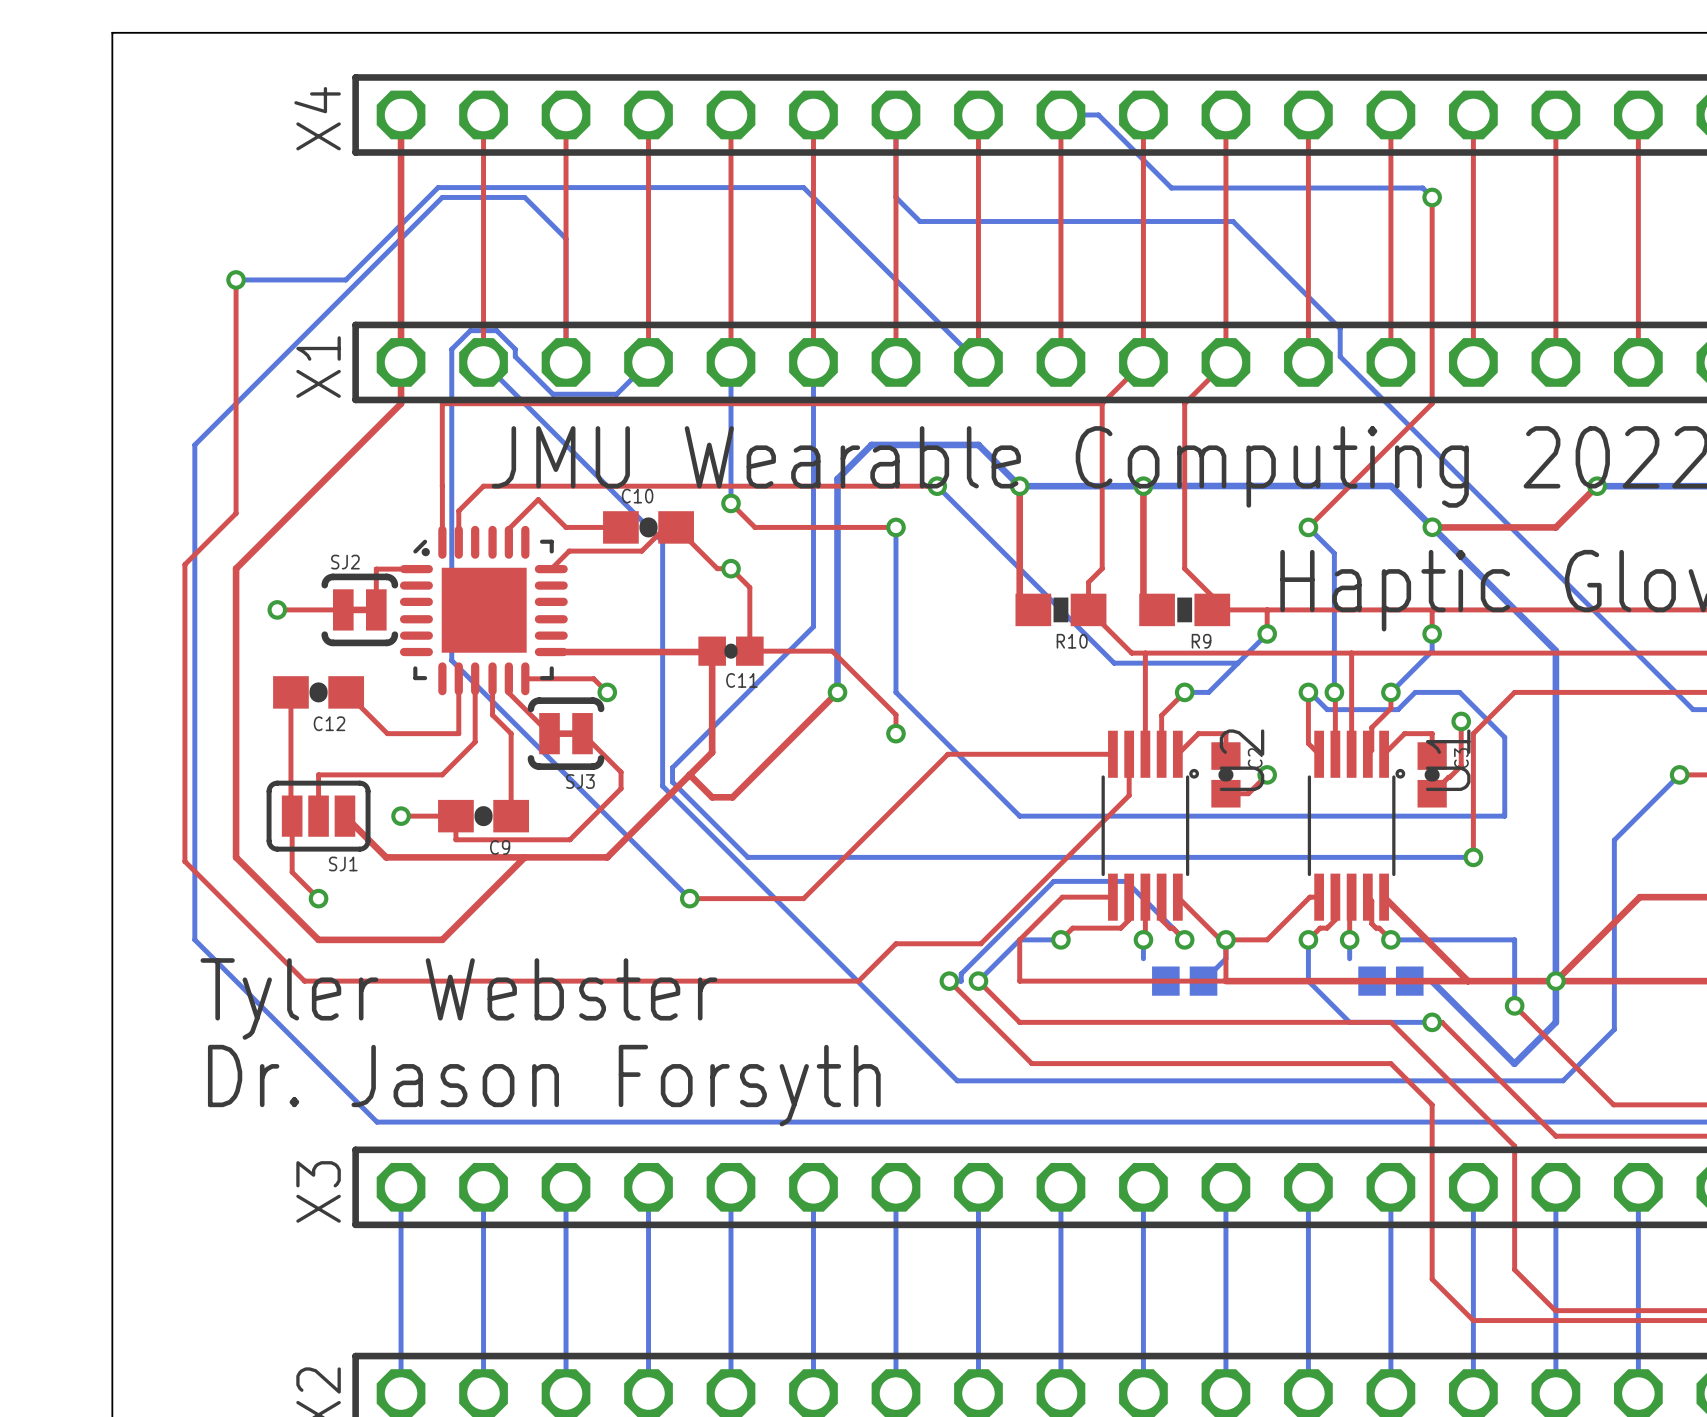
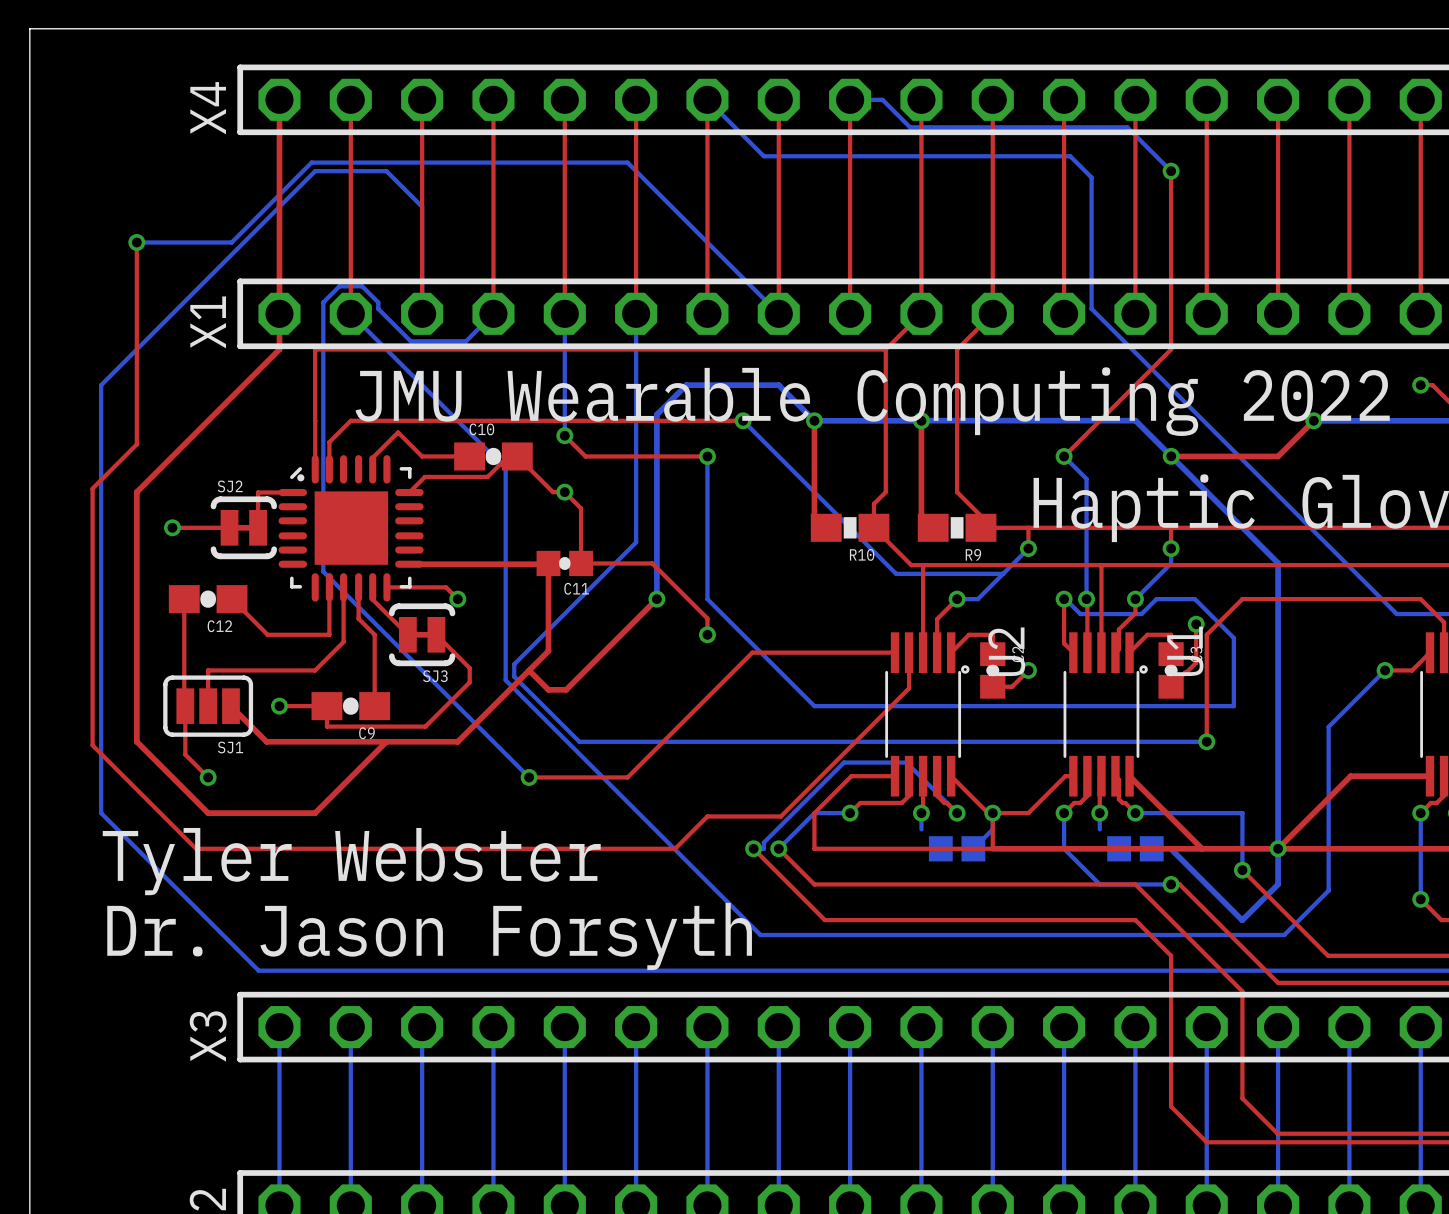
bottom track: (895, 114) (895, 197) (919, 221) (1233, 221) (1340, 328) -> (707, 99) (763, 156) (1070, 156) (1091, 177) (1091, 284)
bottom track: (1130, 146) (1171, 188) (1422, 188) -> (910, 127) (1127, 127) (1162, 162)

